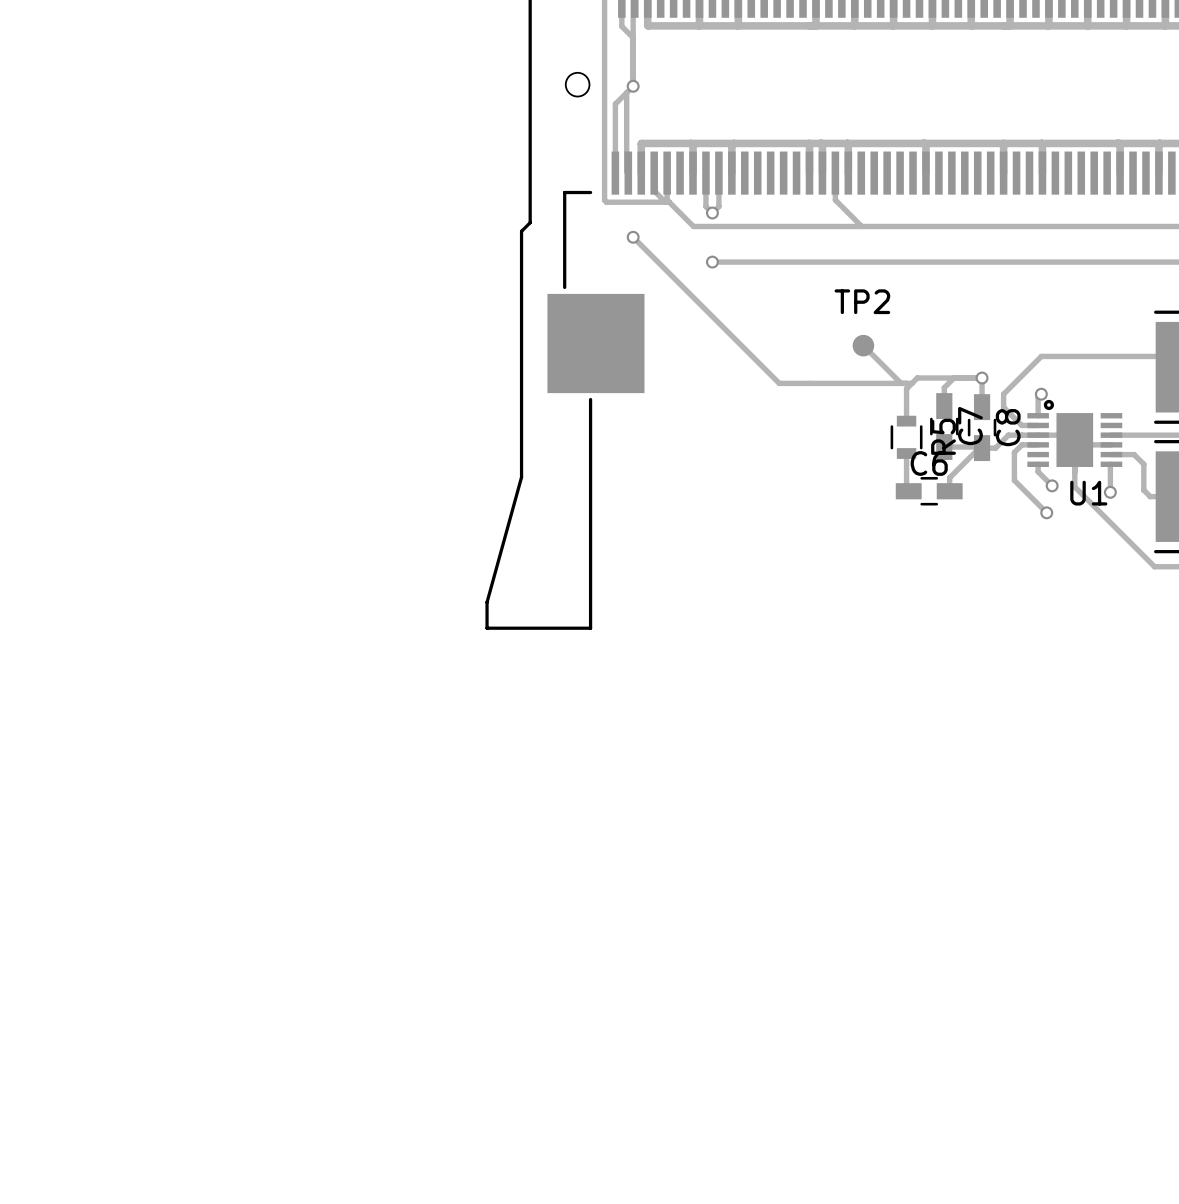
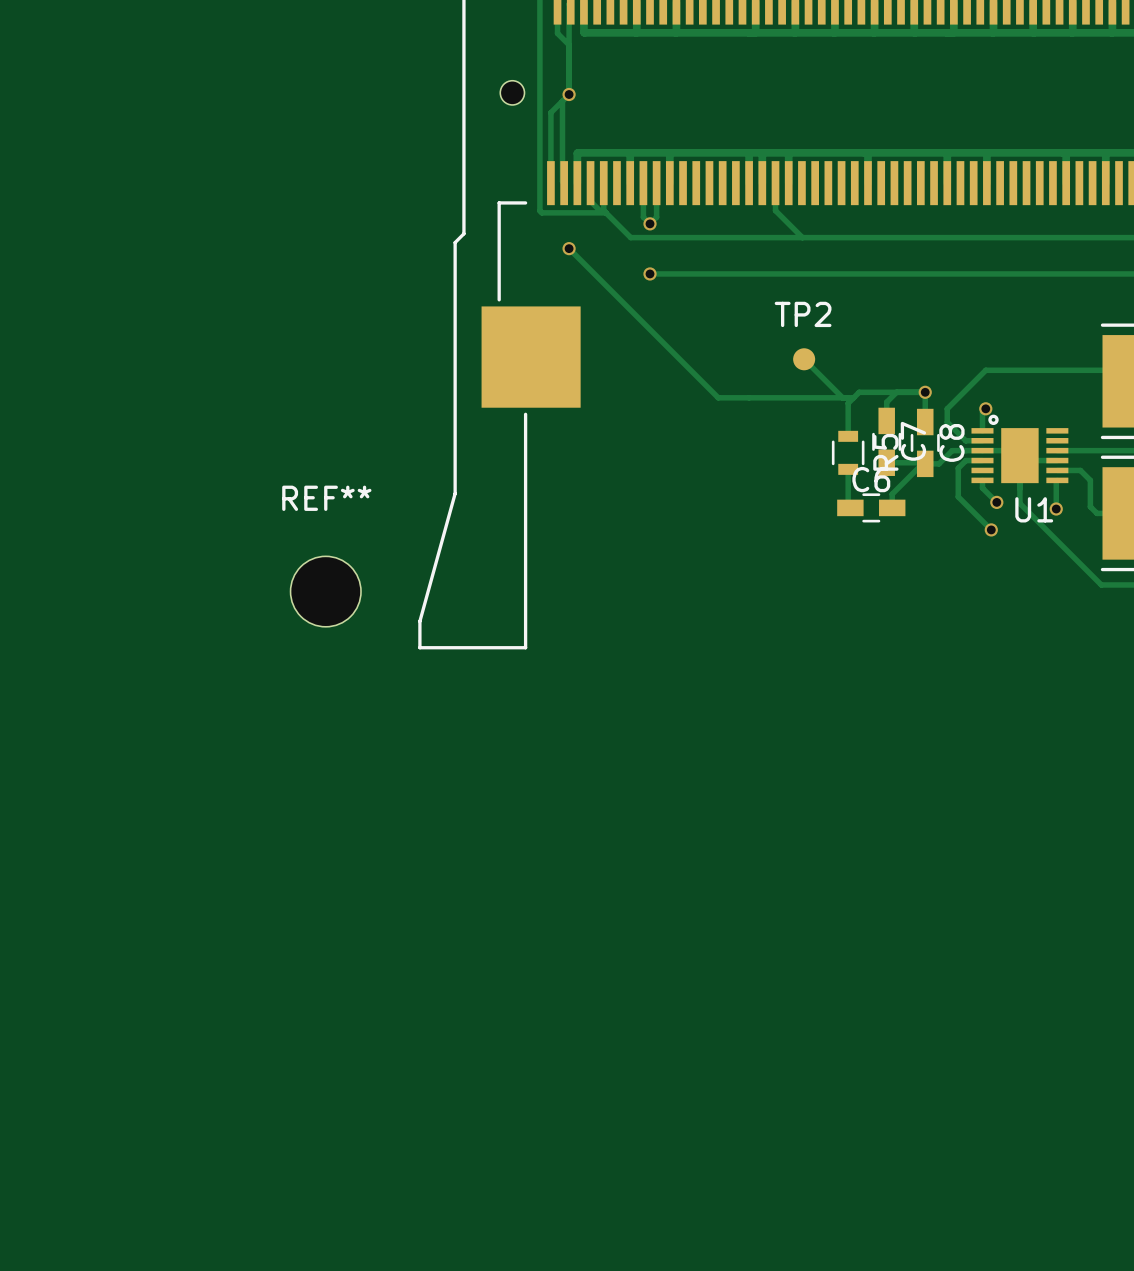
REF**: none -> (325, 591)

